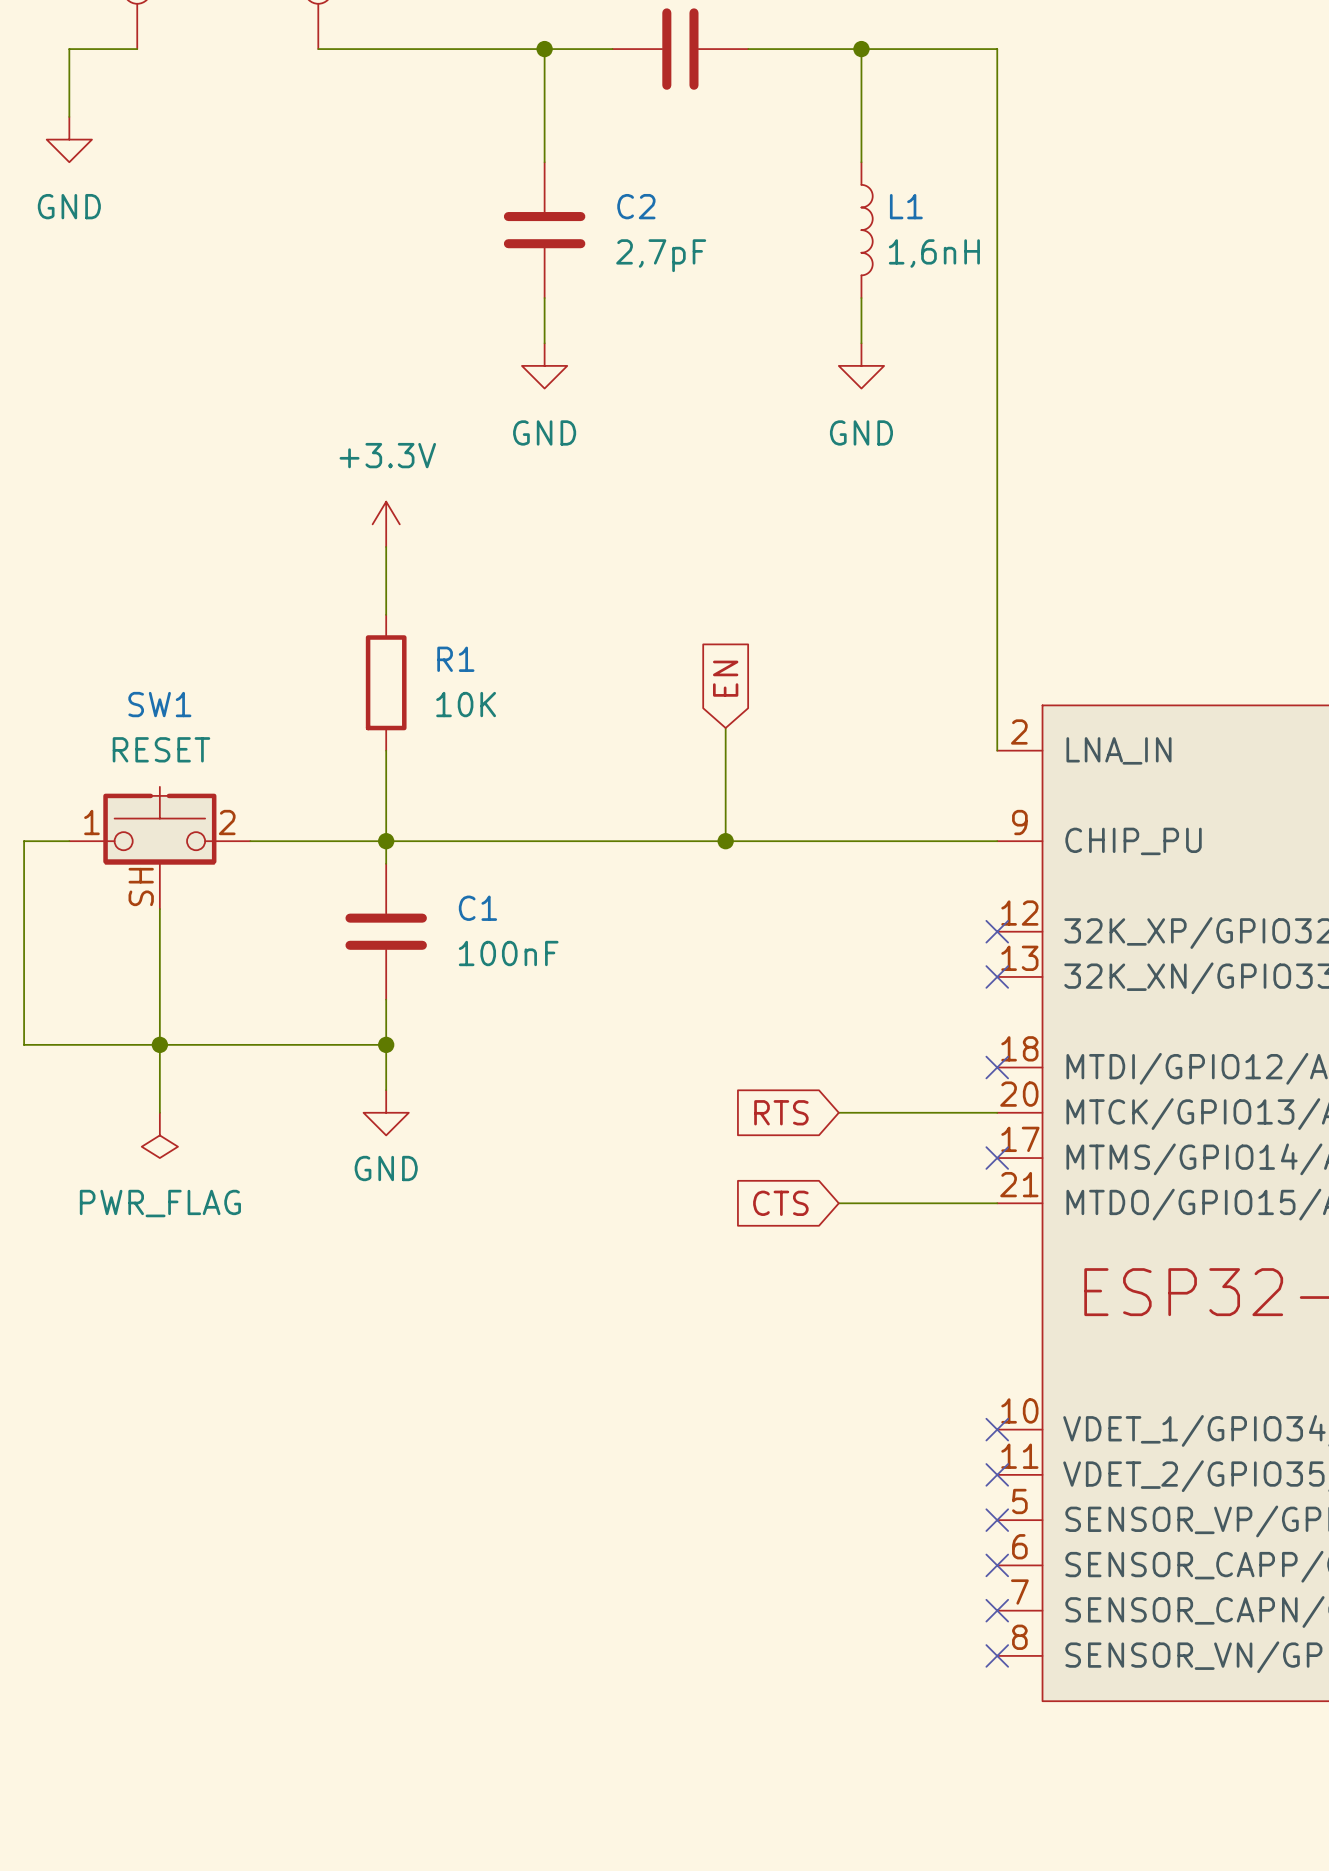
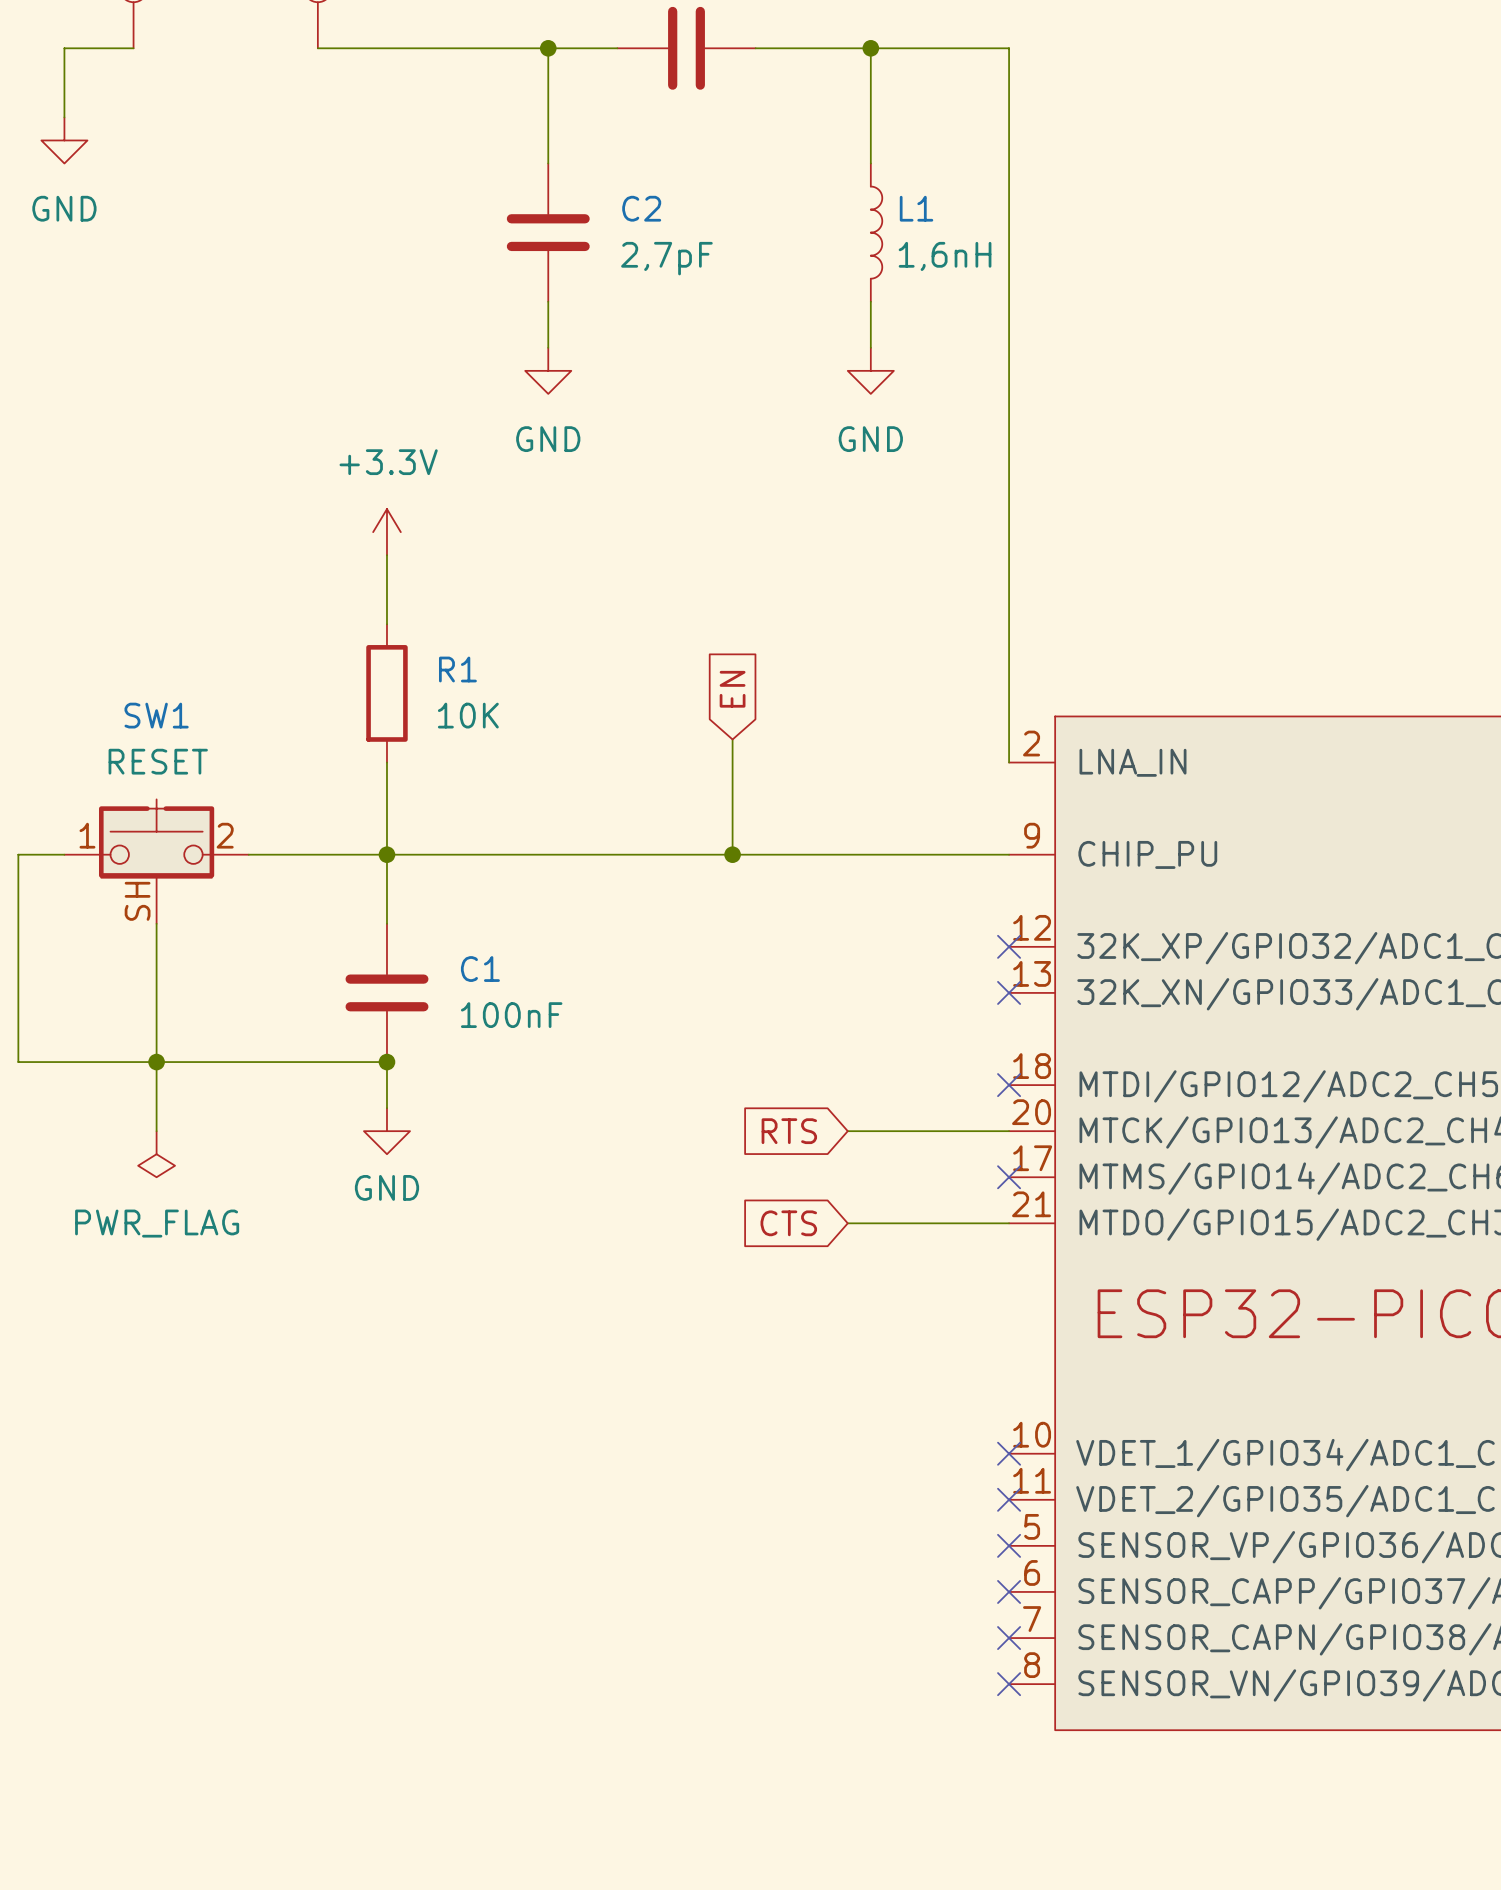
C1 position: (386, 931) -> (386, 992)

